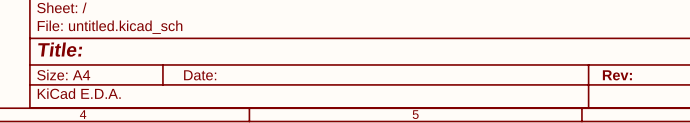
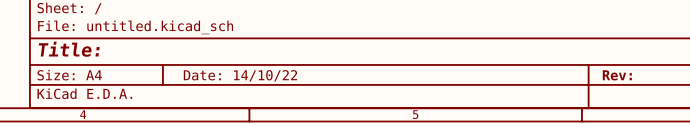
title block: Date: (200, 75) -> Date: 14/10/22 (240, 75)

